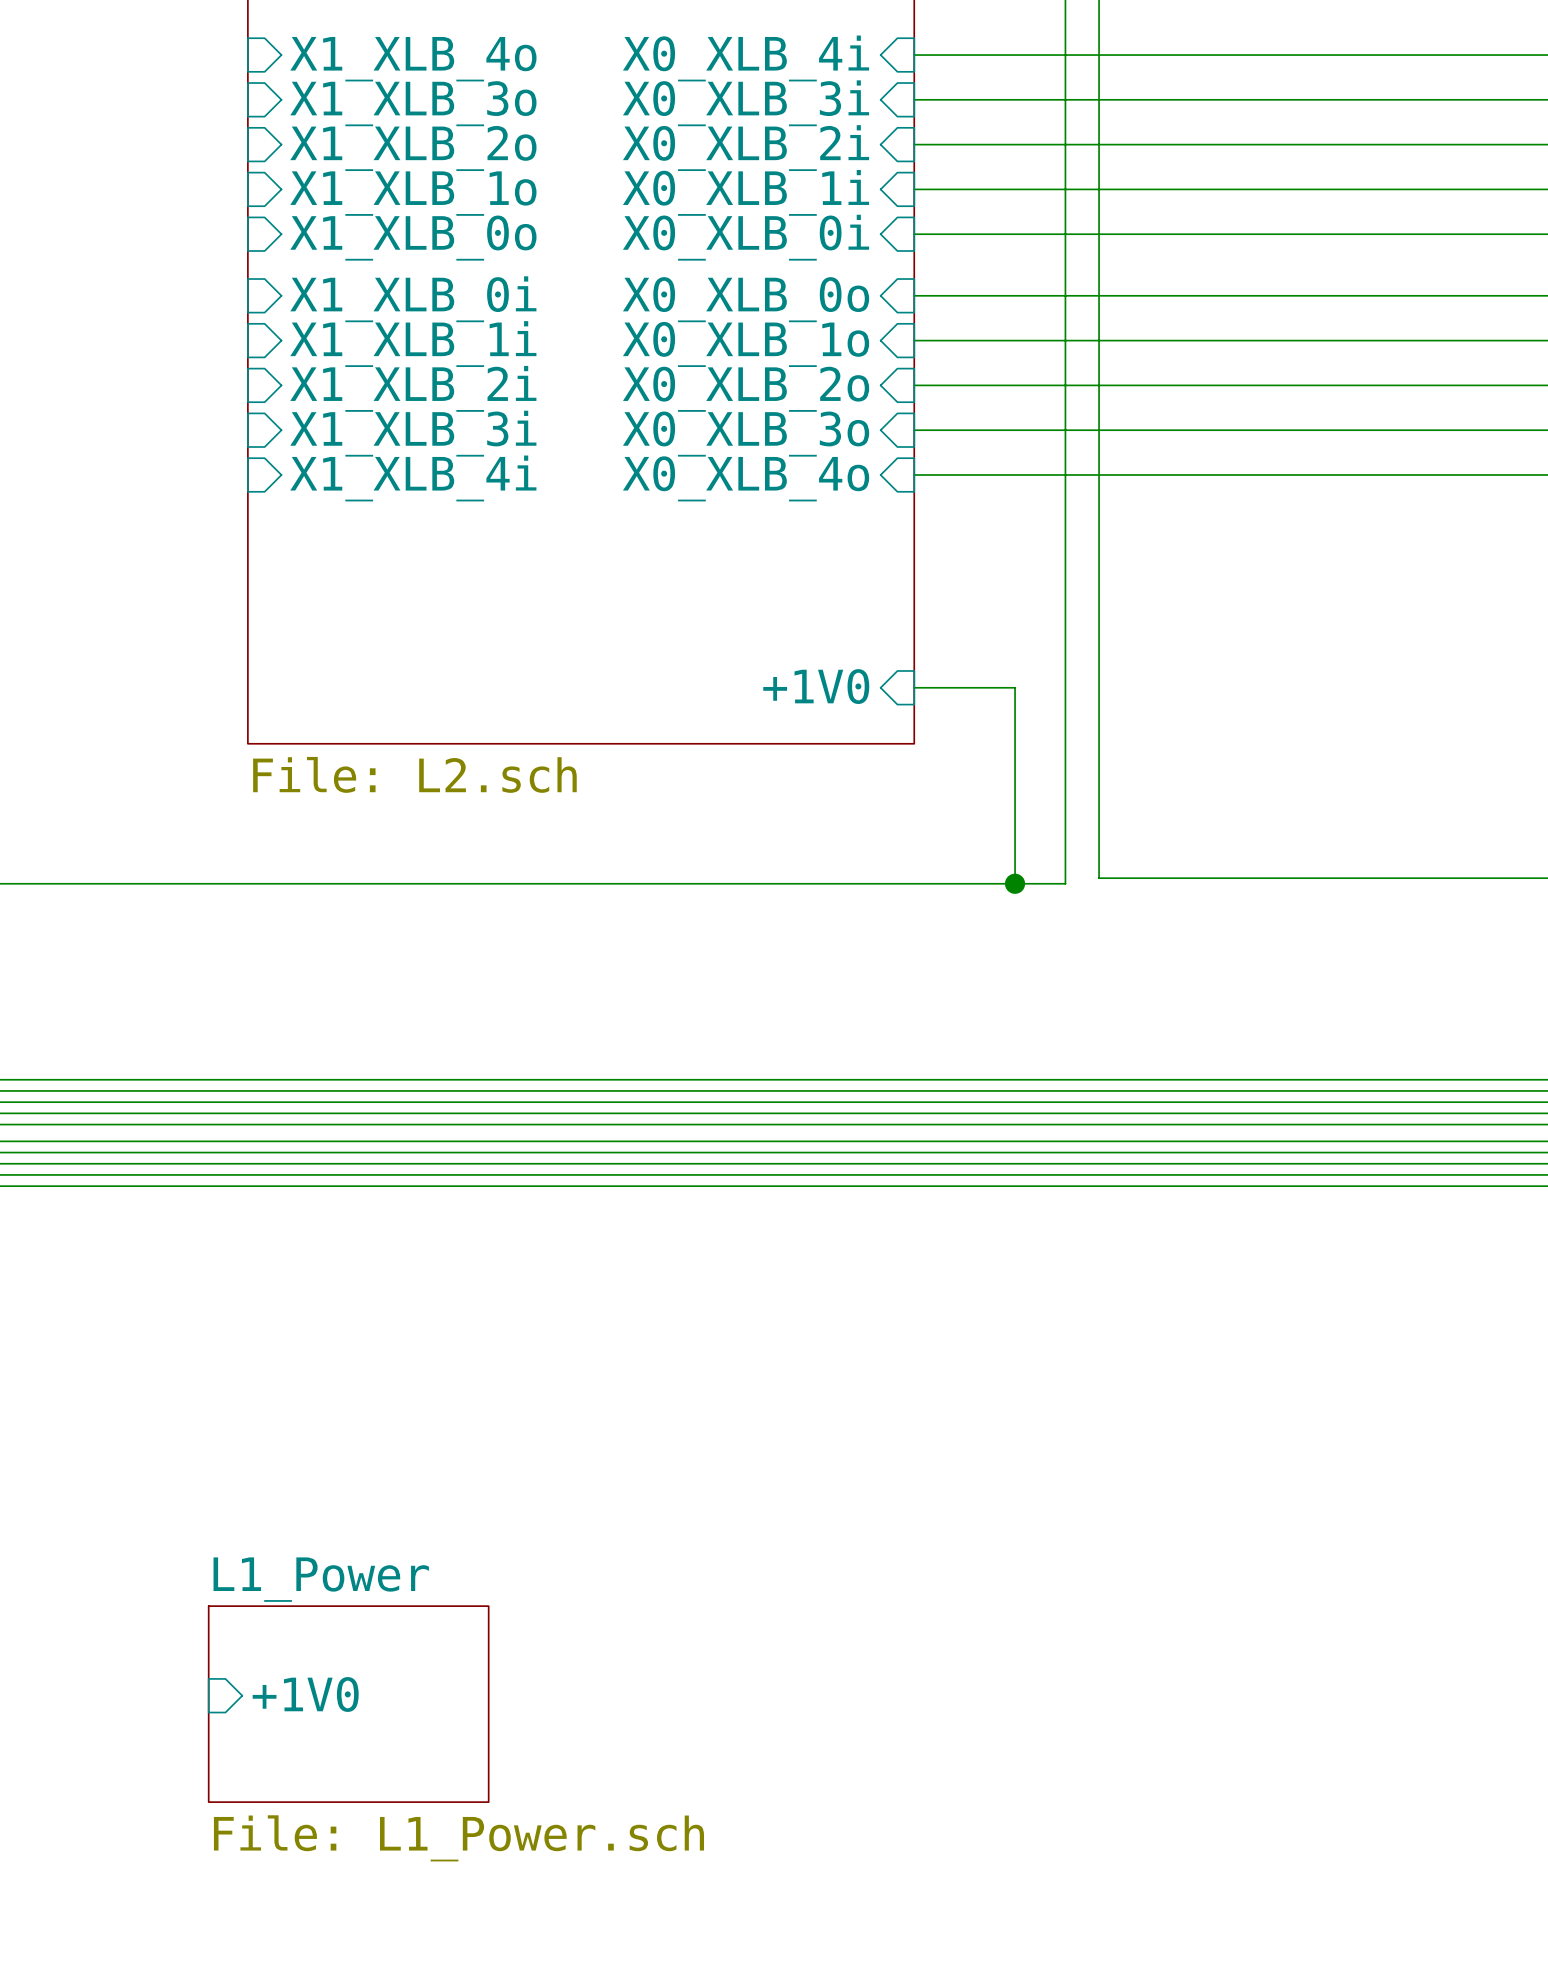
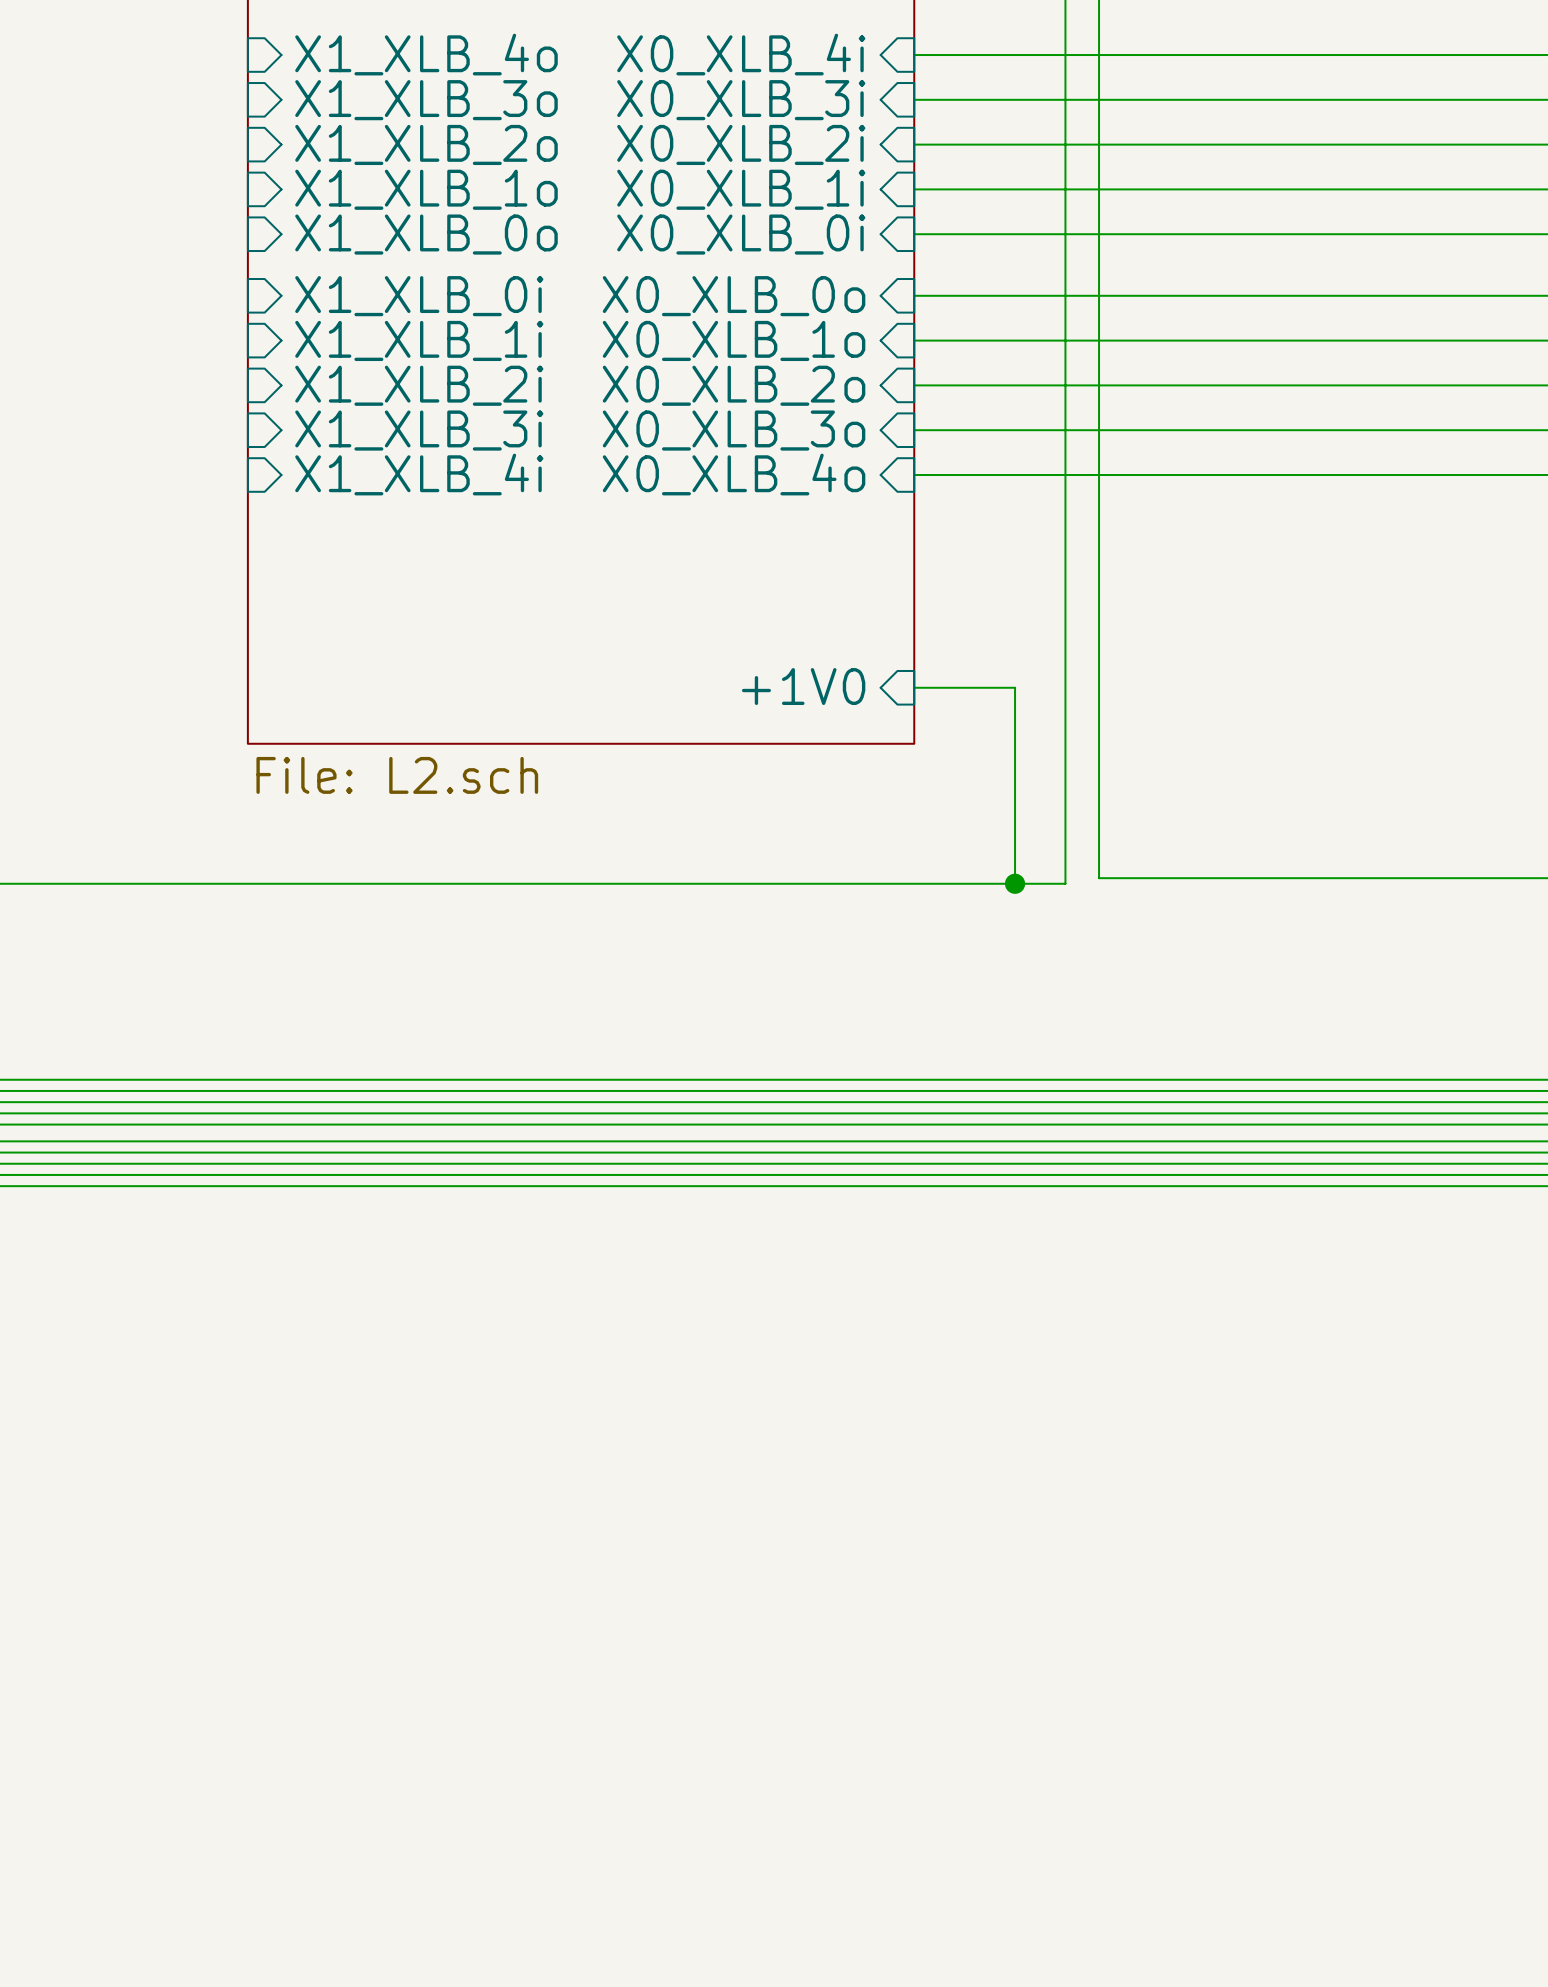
sheet pin: +1V0 (305, 1694) -> none
sheet L1_Power: File: L1_Power.sch (348, 1704) -> none

